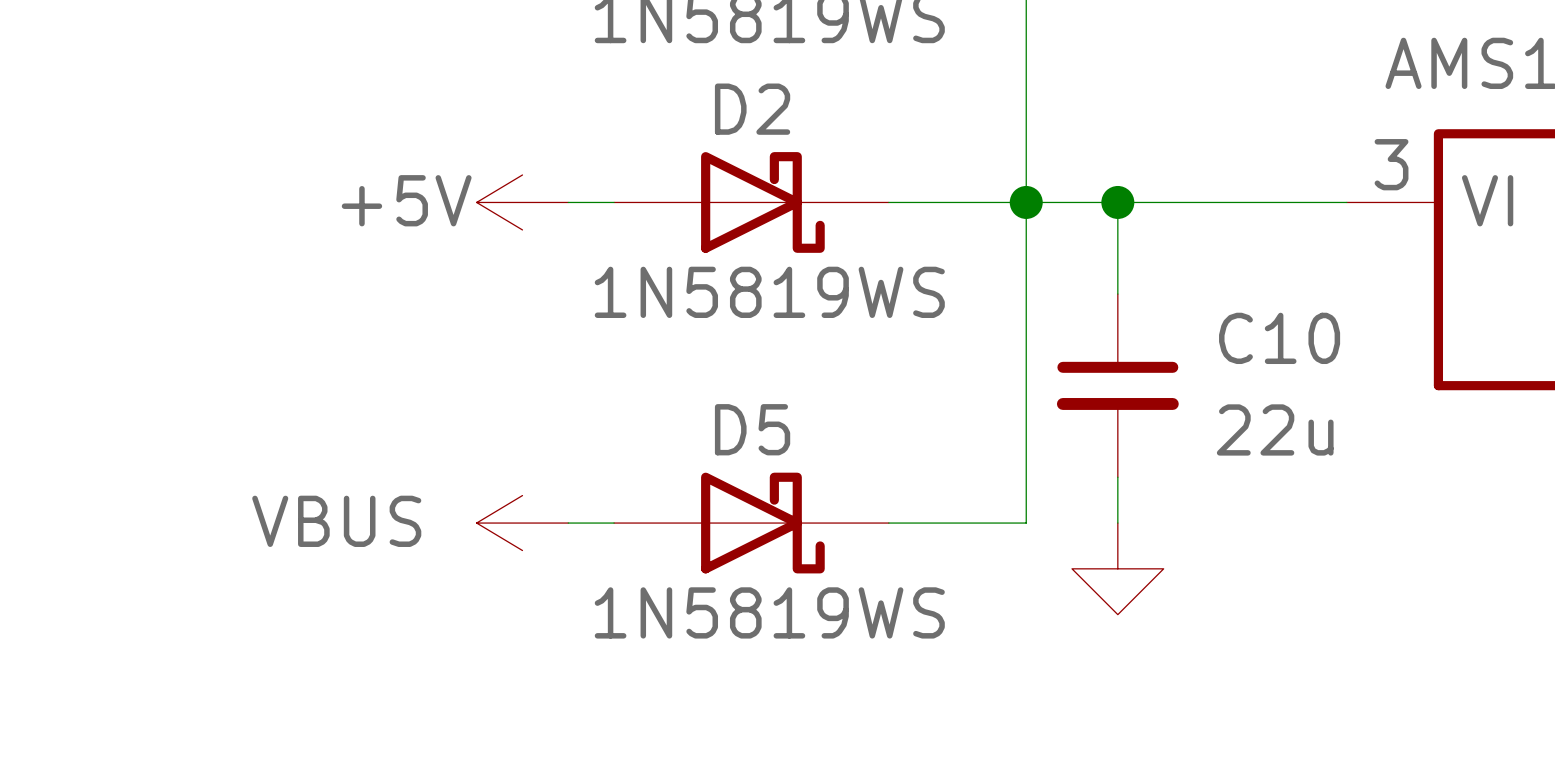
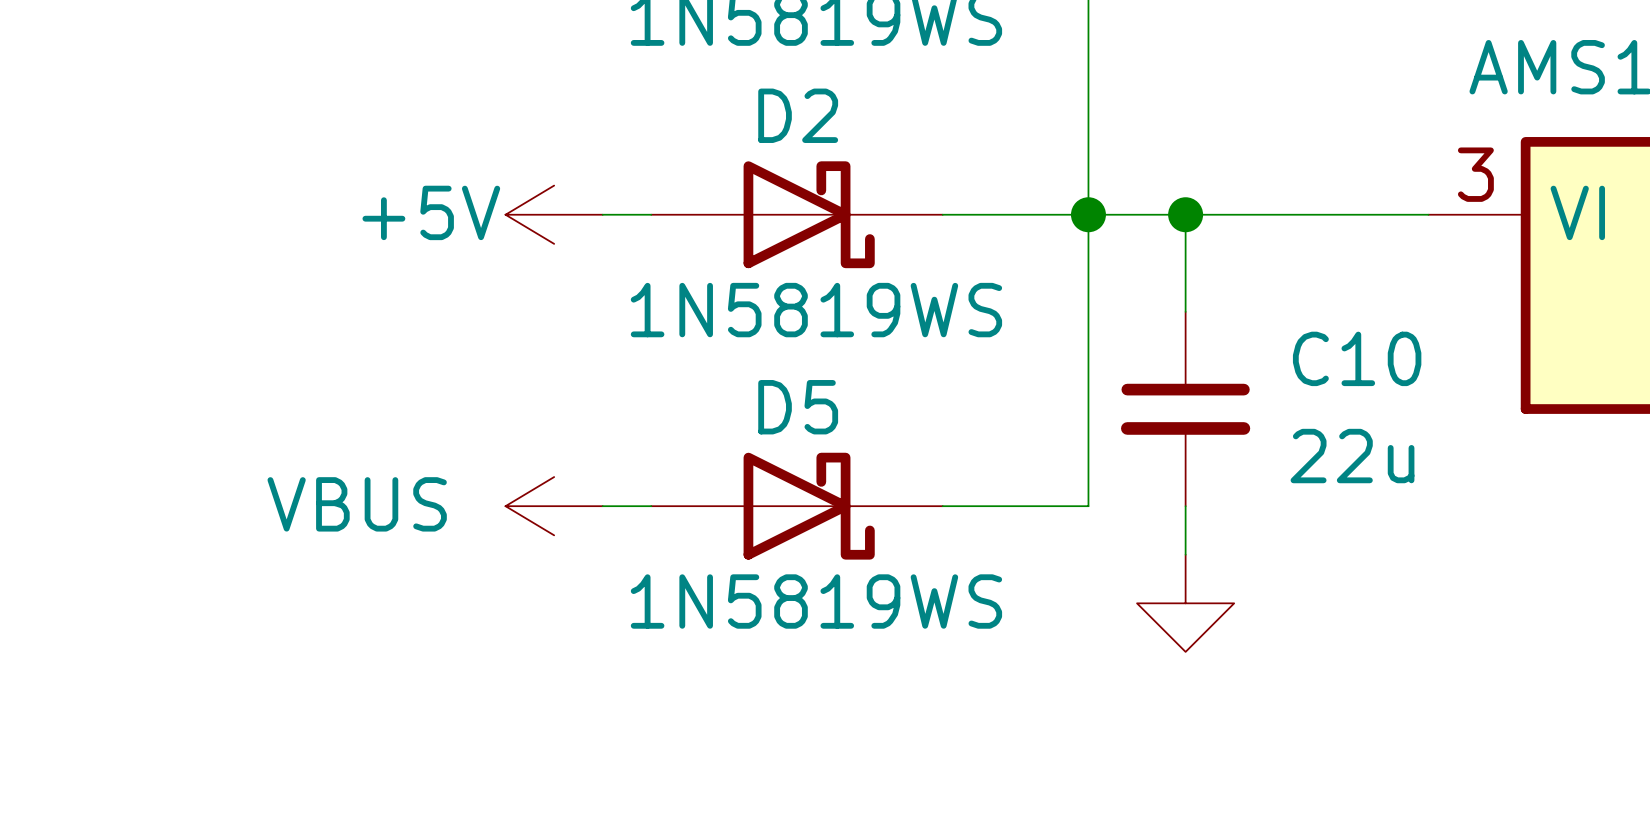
wire: (1026, 477) (1026, 523) (888, 523) -> (1088, 506) (942, 506)
power symbol position: VBUS (522, 523) -> VBUS (554, 506)
wire: (568, 523) (614, 523) -> (602, 506) (651, 506)
D5 position: (751, 523) -> (797, 506)

